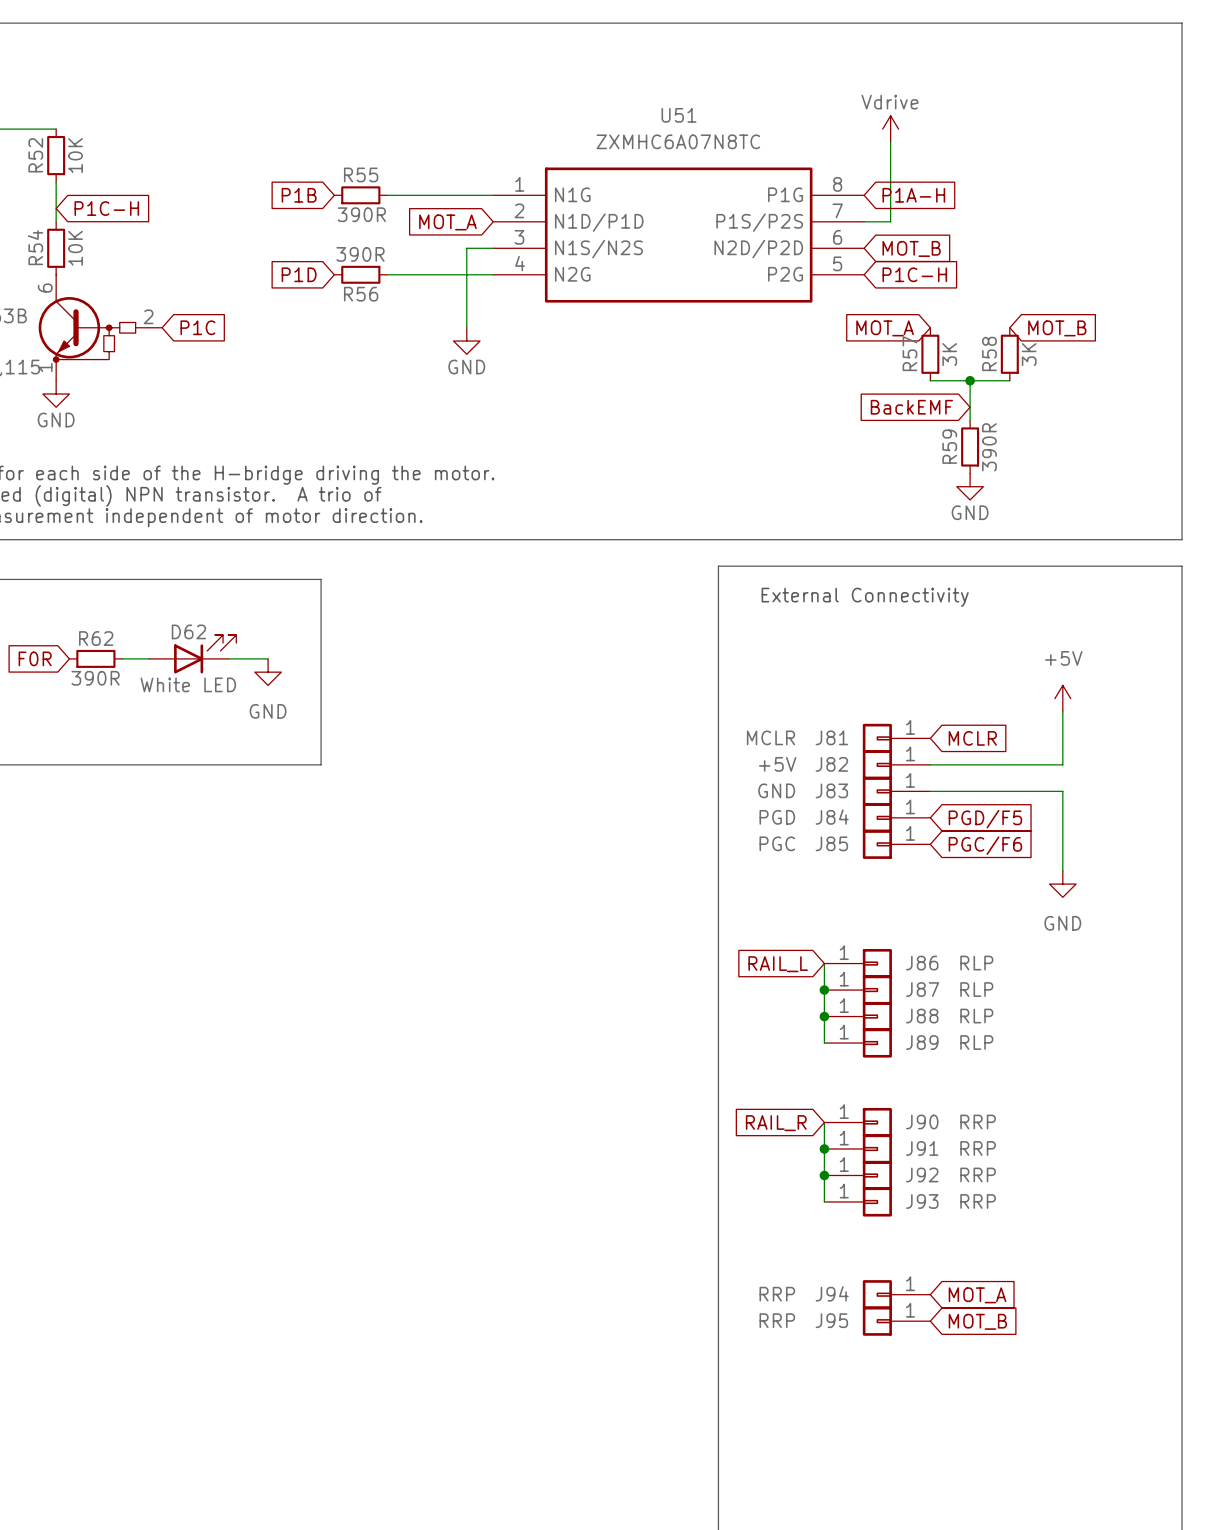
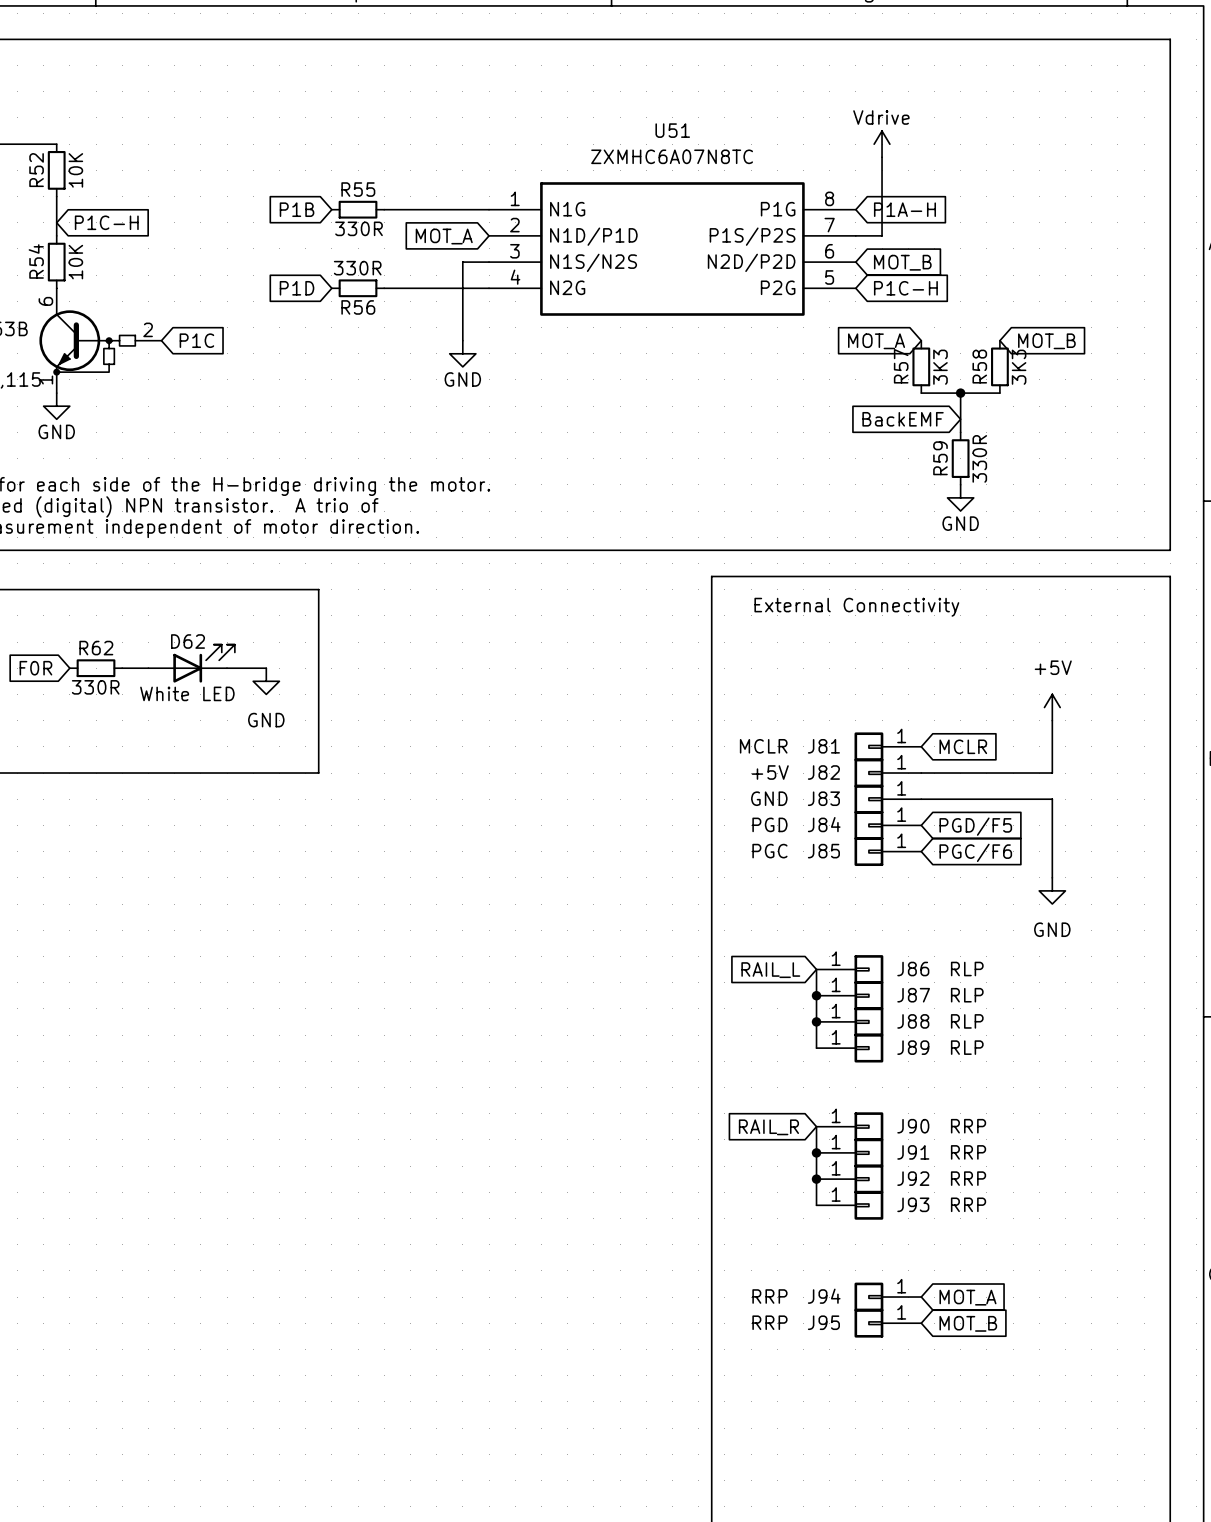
R55 value: 390R (361, 214) -> 330R (359, 228)
R56 value: 390R (360, 254) -> 330R (357, 268)
R57 value: 3K (949, 354) -> 3K3 (940, 367)
R58 value: 3K (1029, 354) -> 3K3 (1019, 367)
R59 value: 390R (989, 447) -> 330R (979, 458)
R62 value: 390R (95, 678) -> 330R (95, 687)

